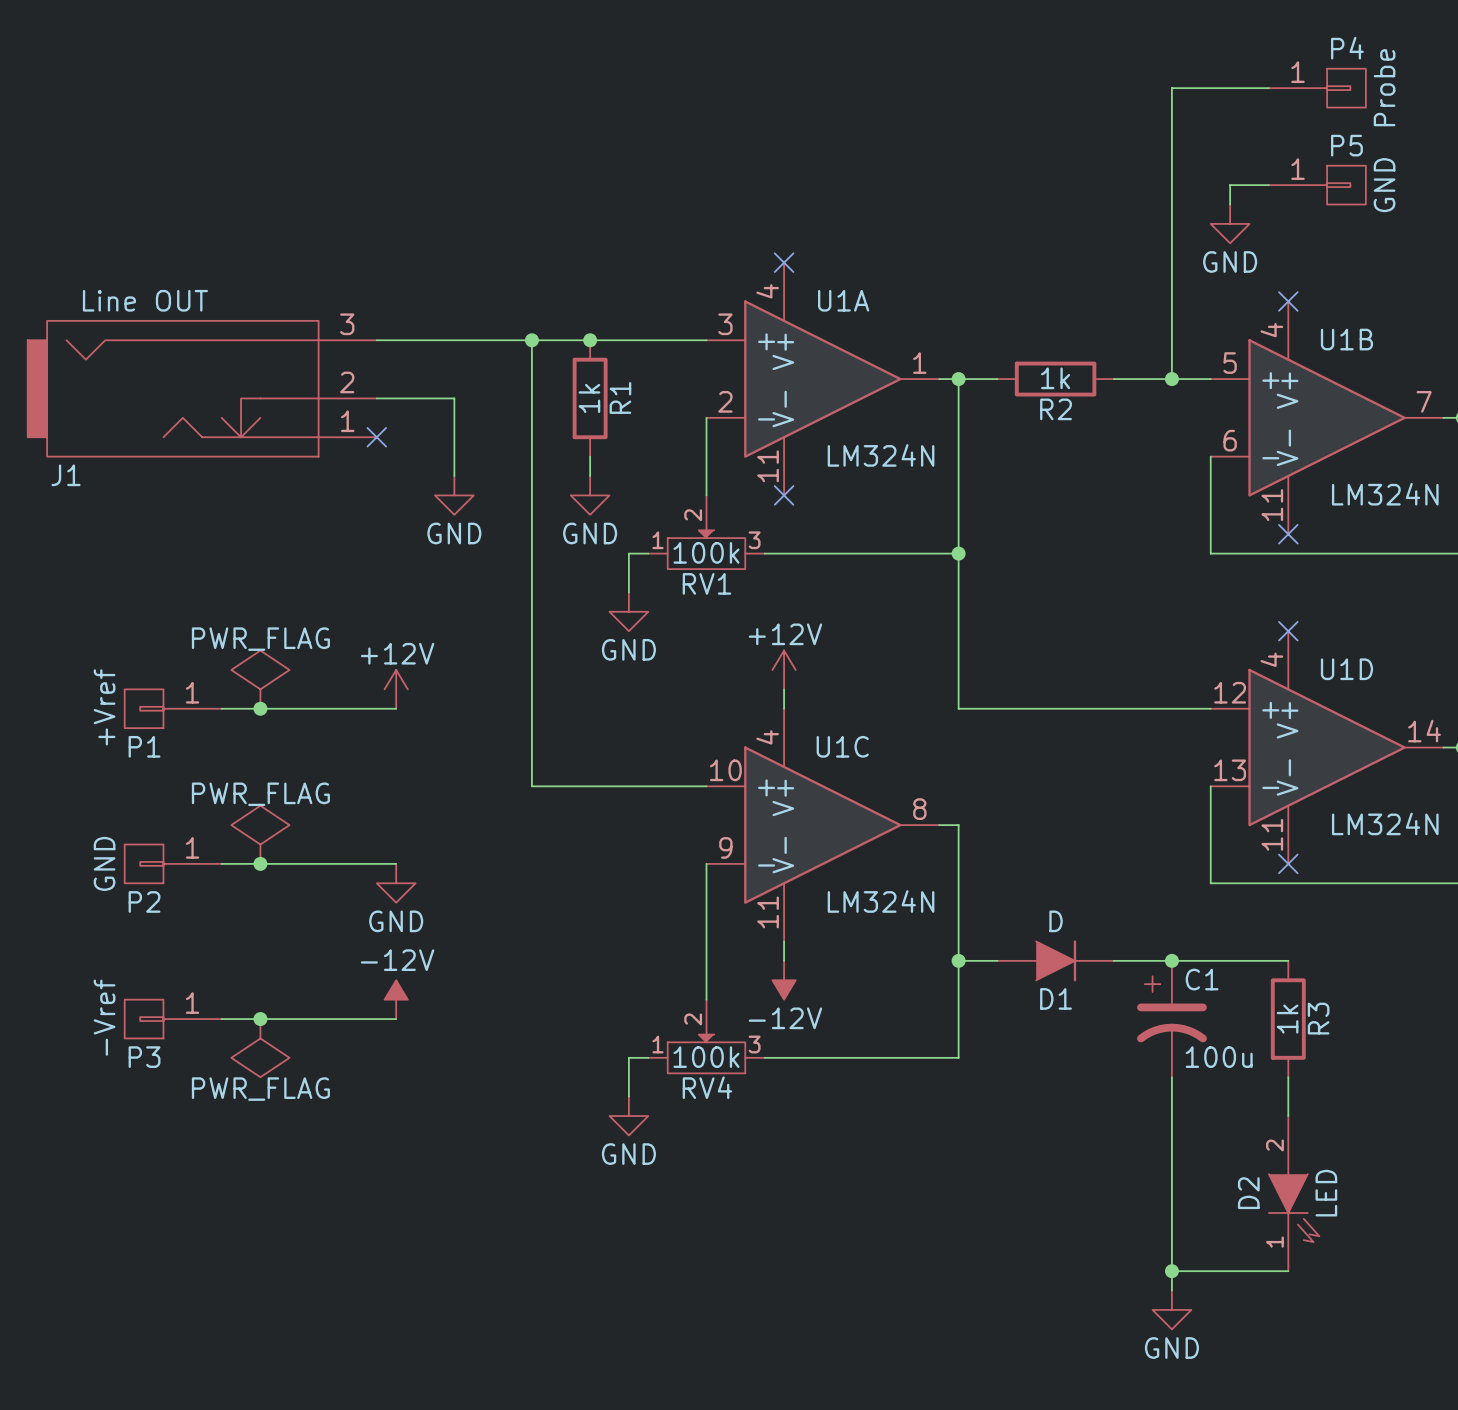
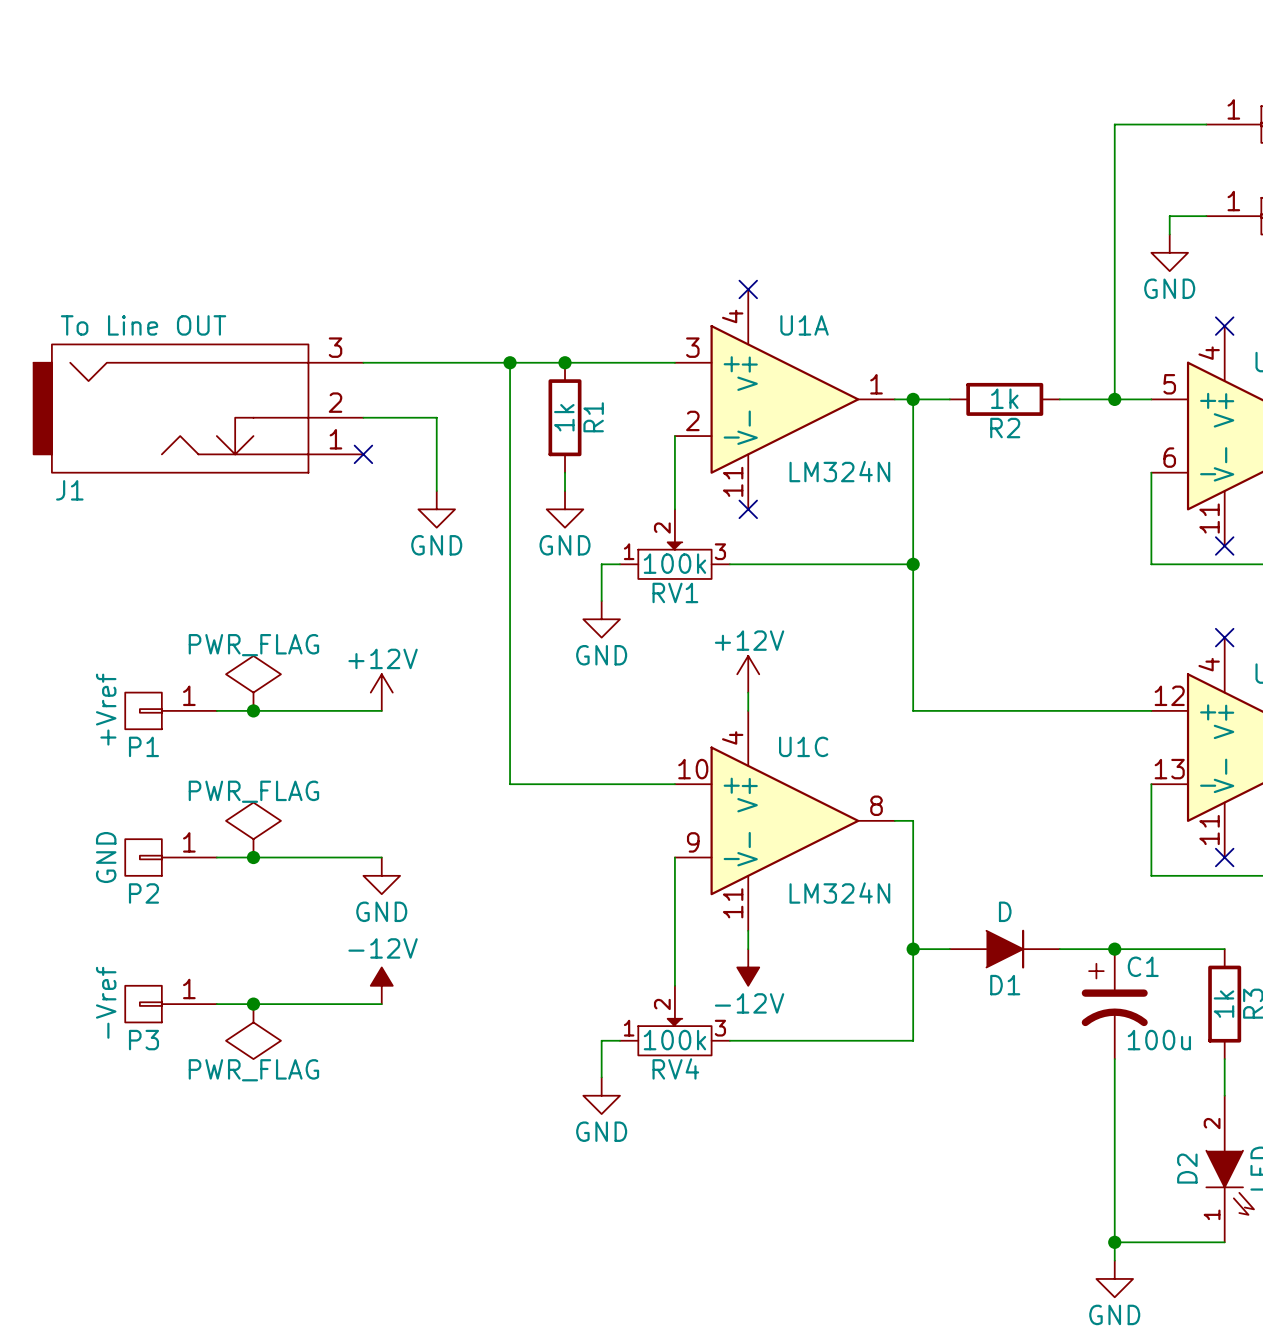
J1 value: Line OUT (145, 300) -> To Line OUT (143, 325)

